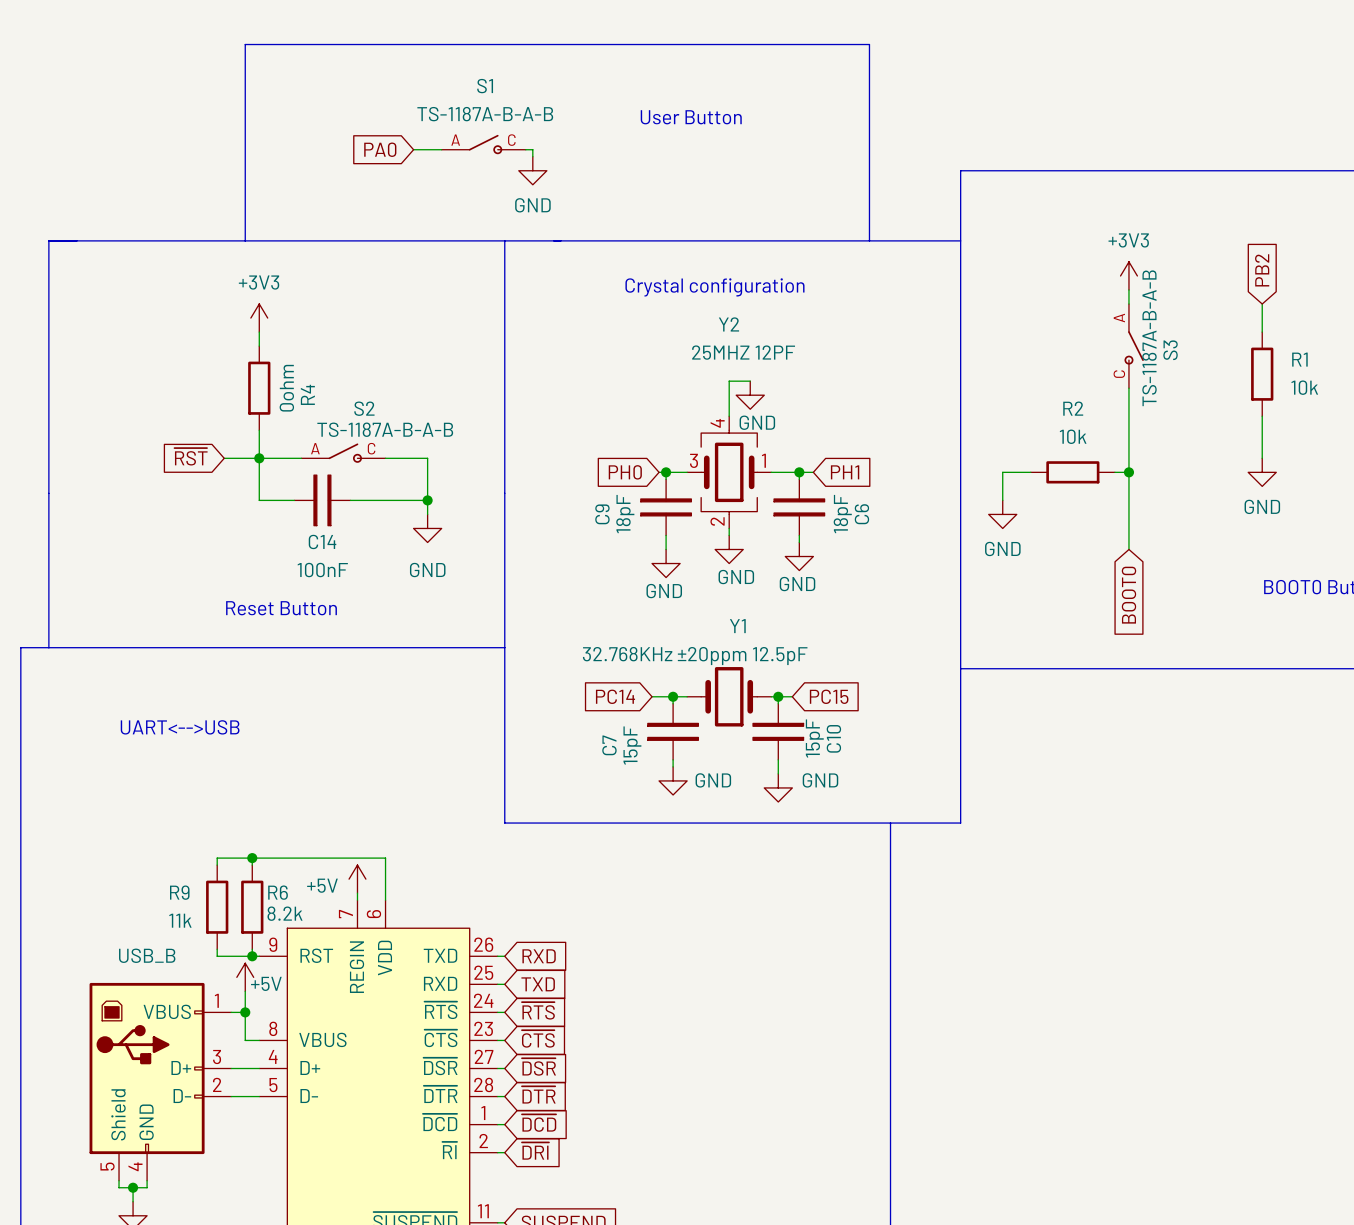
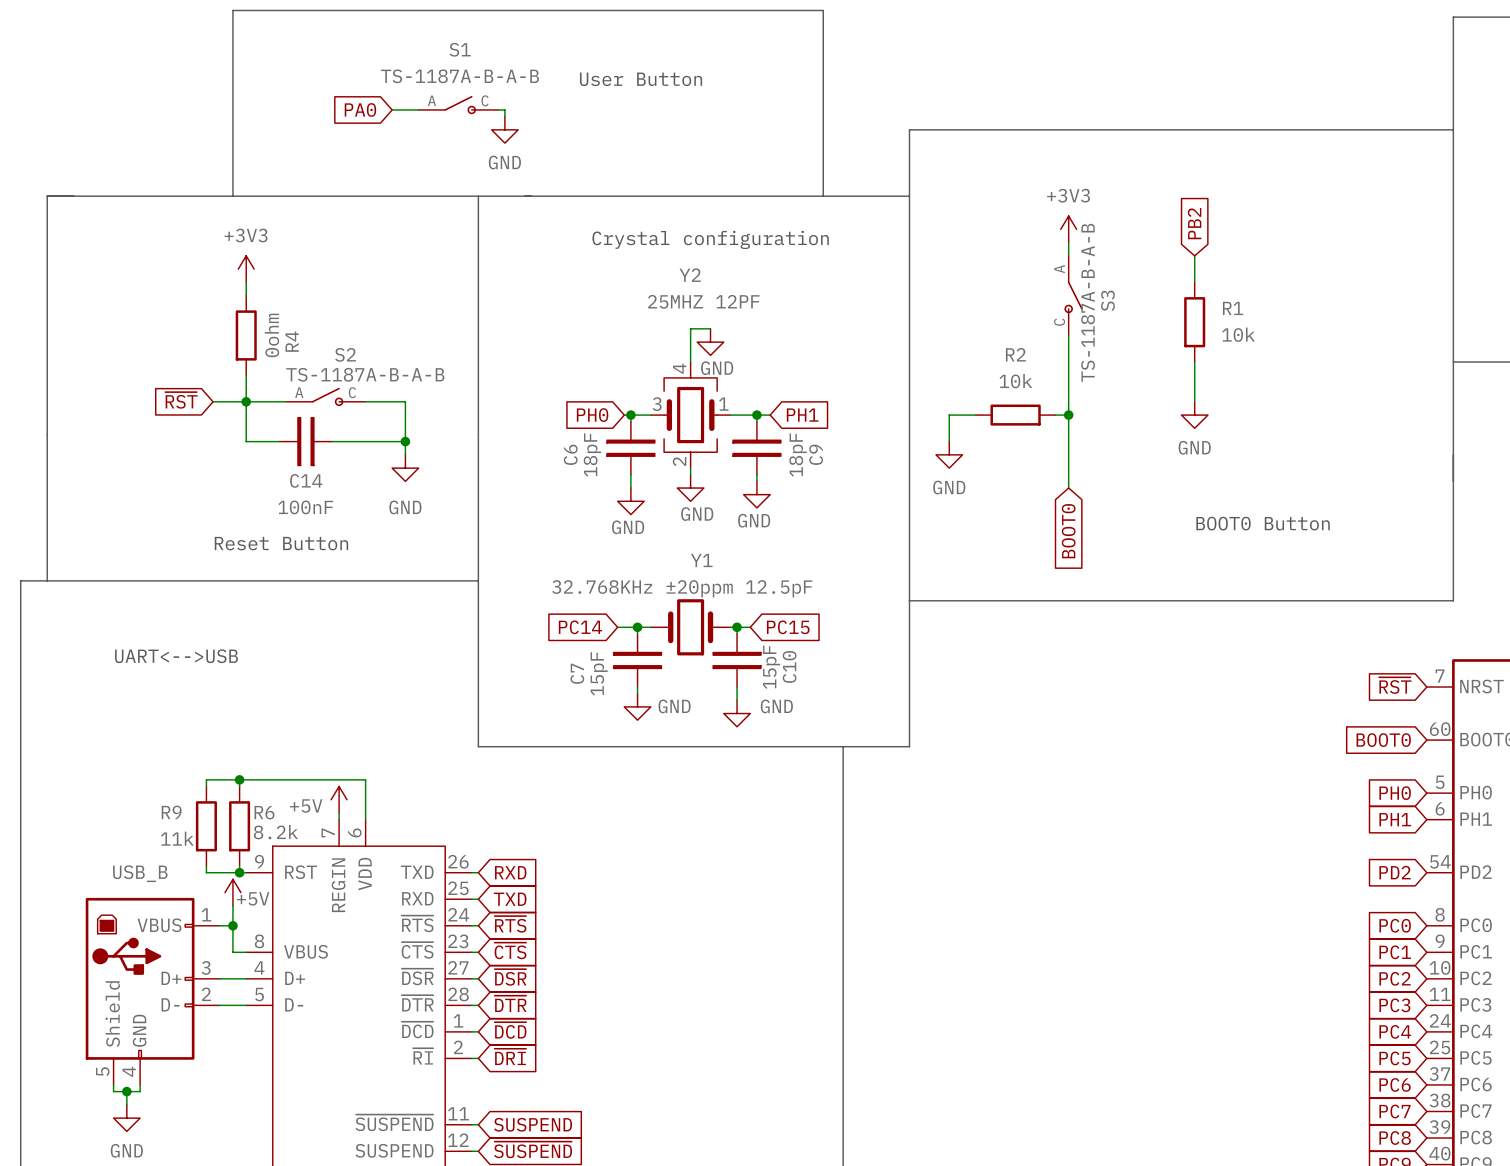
C9 name: C9 (602, 514) -> C6 (570, 454)
C6 name: C6 (861, 514) -> C9 (816, 454)

